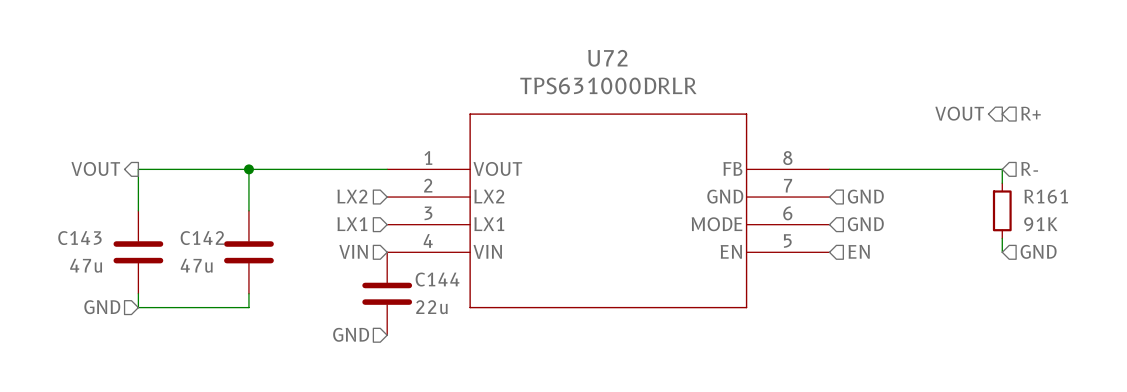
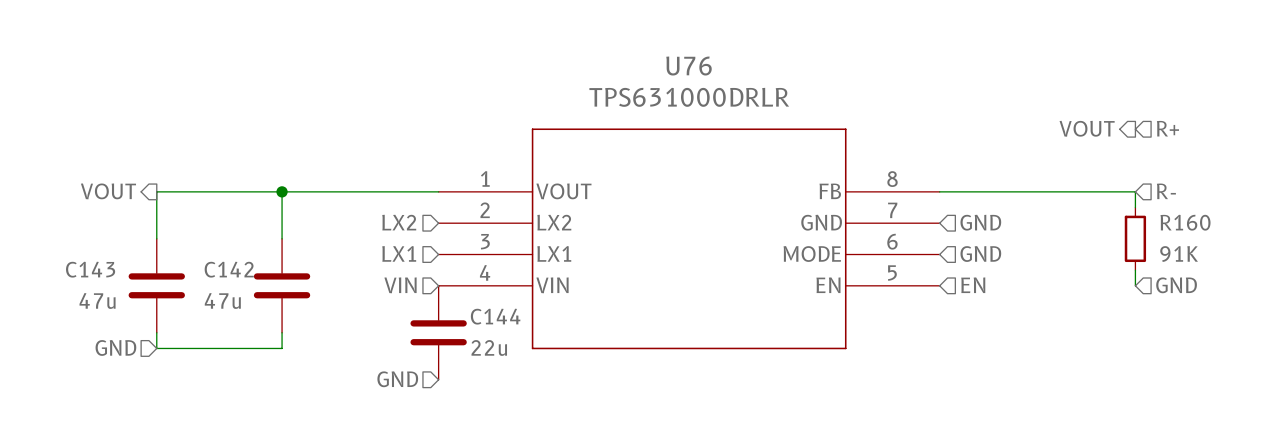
U72 name: U72 (607, 58) -> U76 (689, 66)
R161 name: R161 (1046, 196) -> R160 (1185, 222)

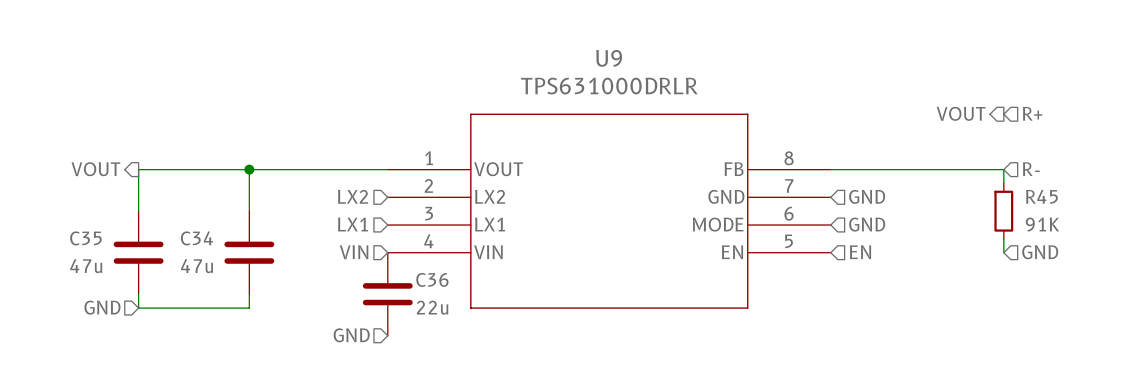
U76 name: U76 (689, 66) -> U9 (609, 58)
R160 name: R160 (1185, 222) -> R45 (1041, 196)
C143 name: C143 (90, 269) -> C35 (85, 238)
C142 name: C142 (229, 269) -> C34 (196, 238)
C144 name: C144 (495, 316) -> C36 (432, 279)

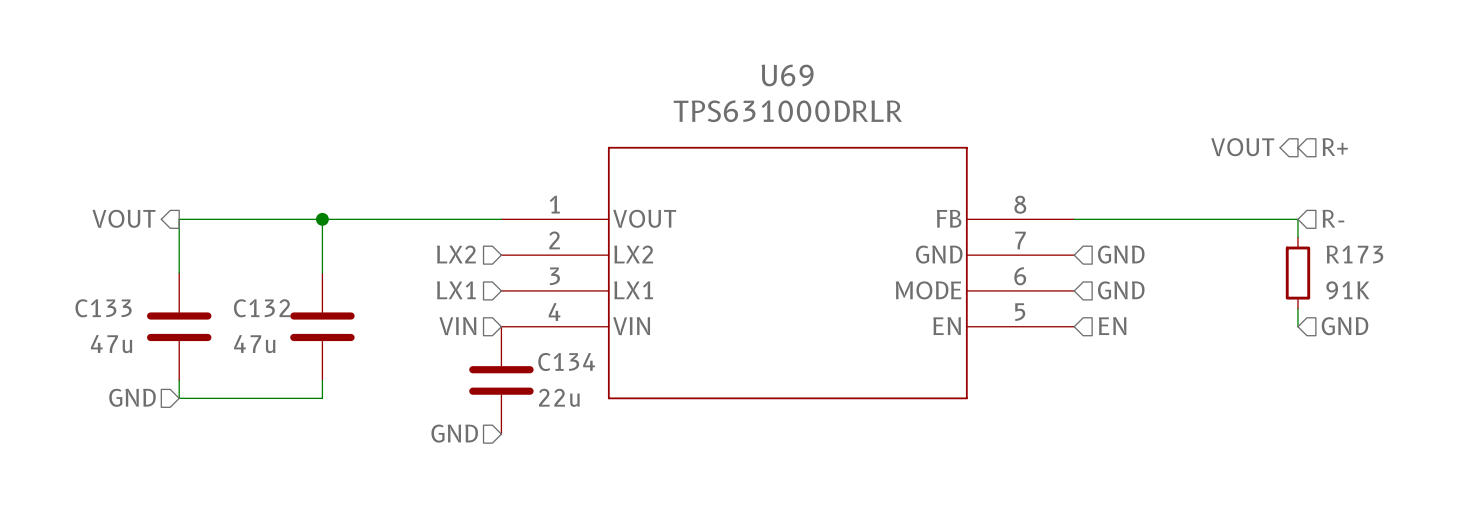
U9 name: U9 (609, 58) -> U69 (787, 75)
R45 name: R45 (1041, 196) -> R173 (1354, 254)
C35 name: C35 (85, 238) -> C133 (103, 308)
C34 name: C34 (196, 238) -> C132 (262, 308)
C36 name: C36 (432, 279) -> C134 (566, 361)

